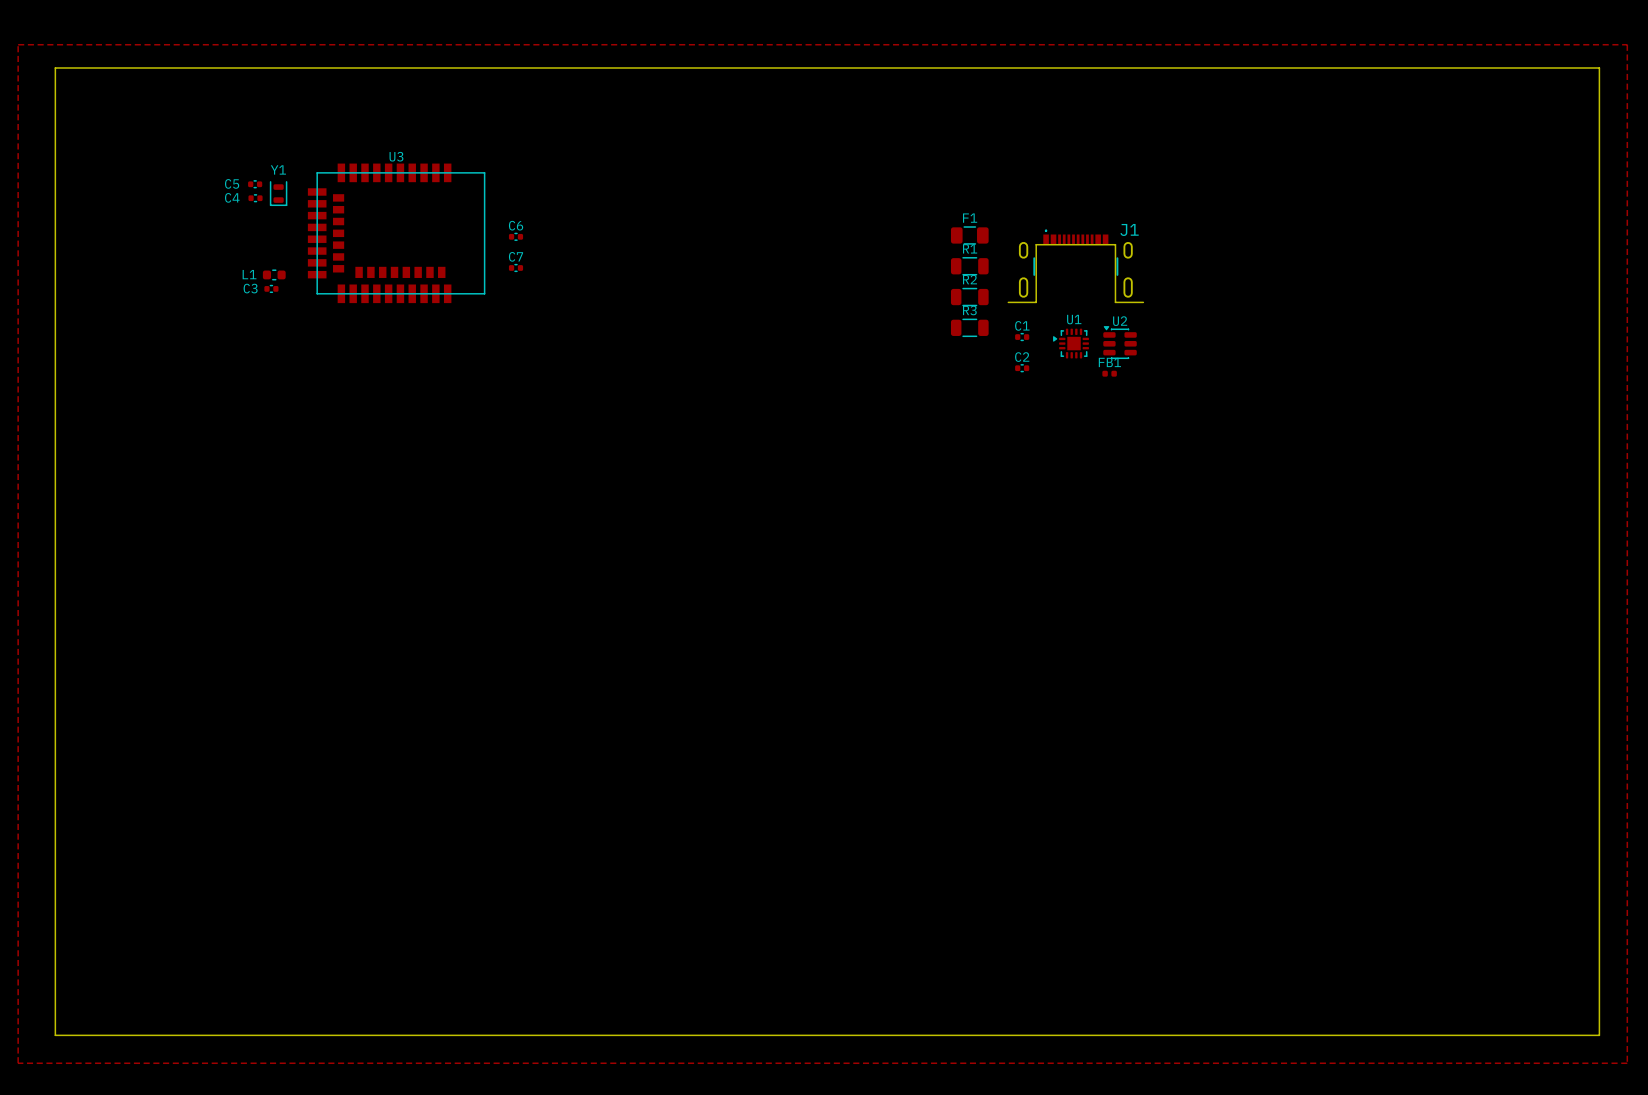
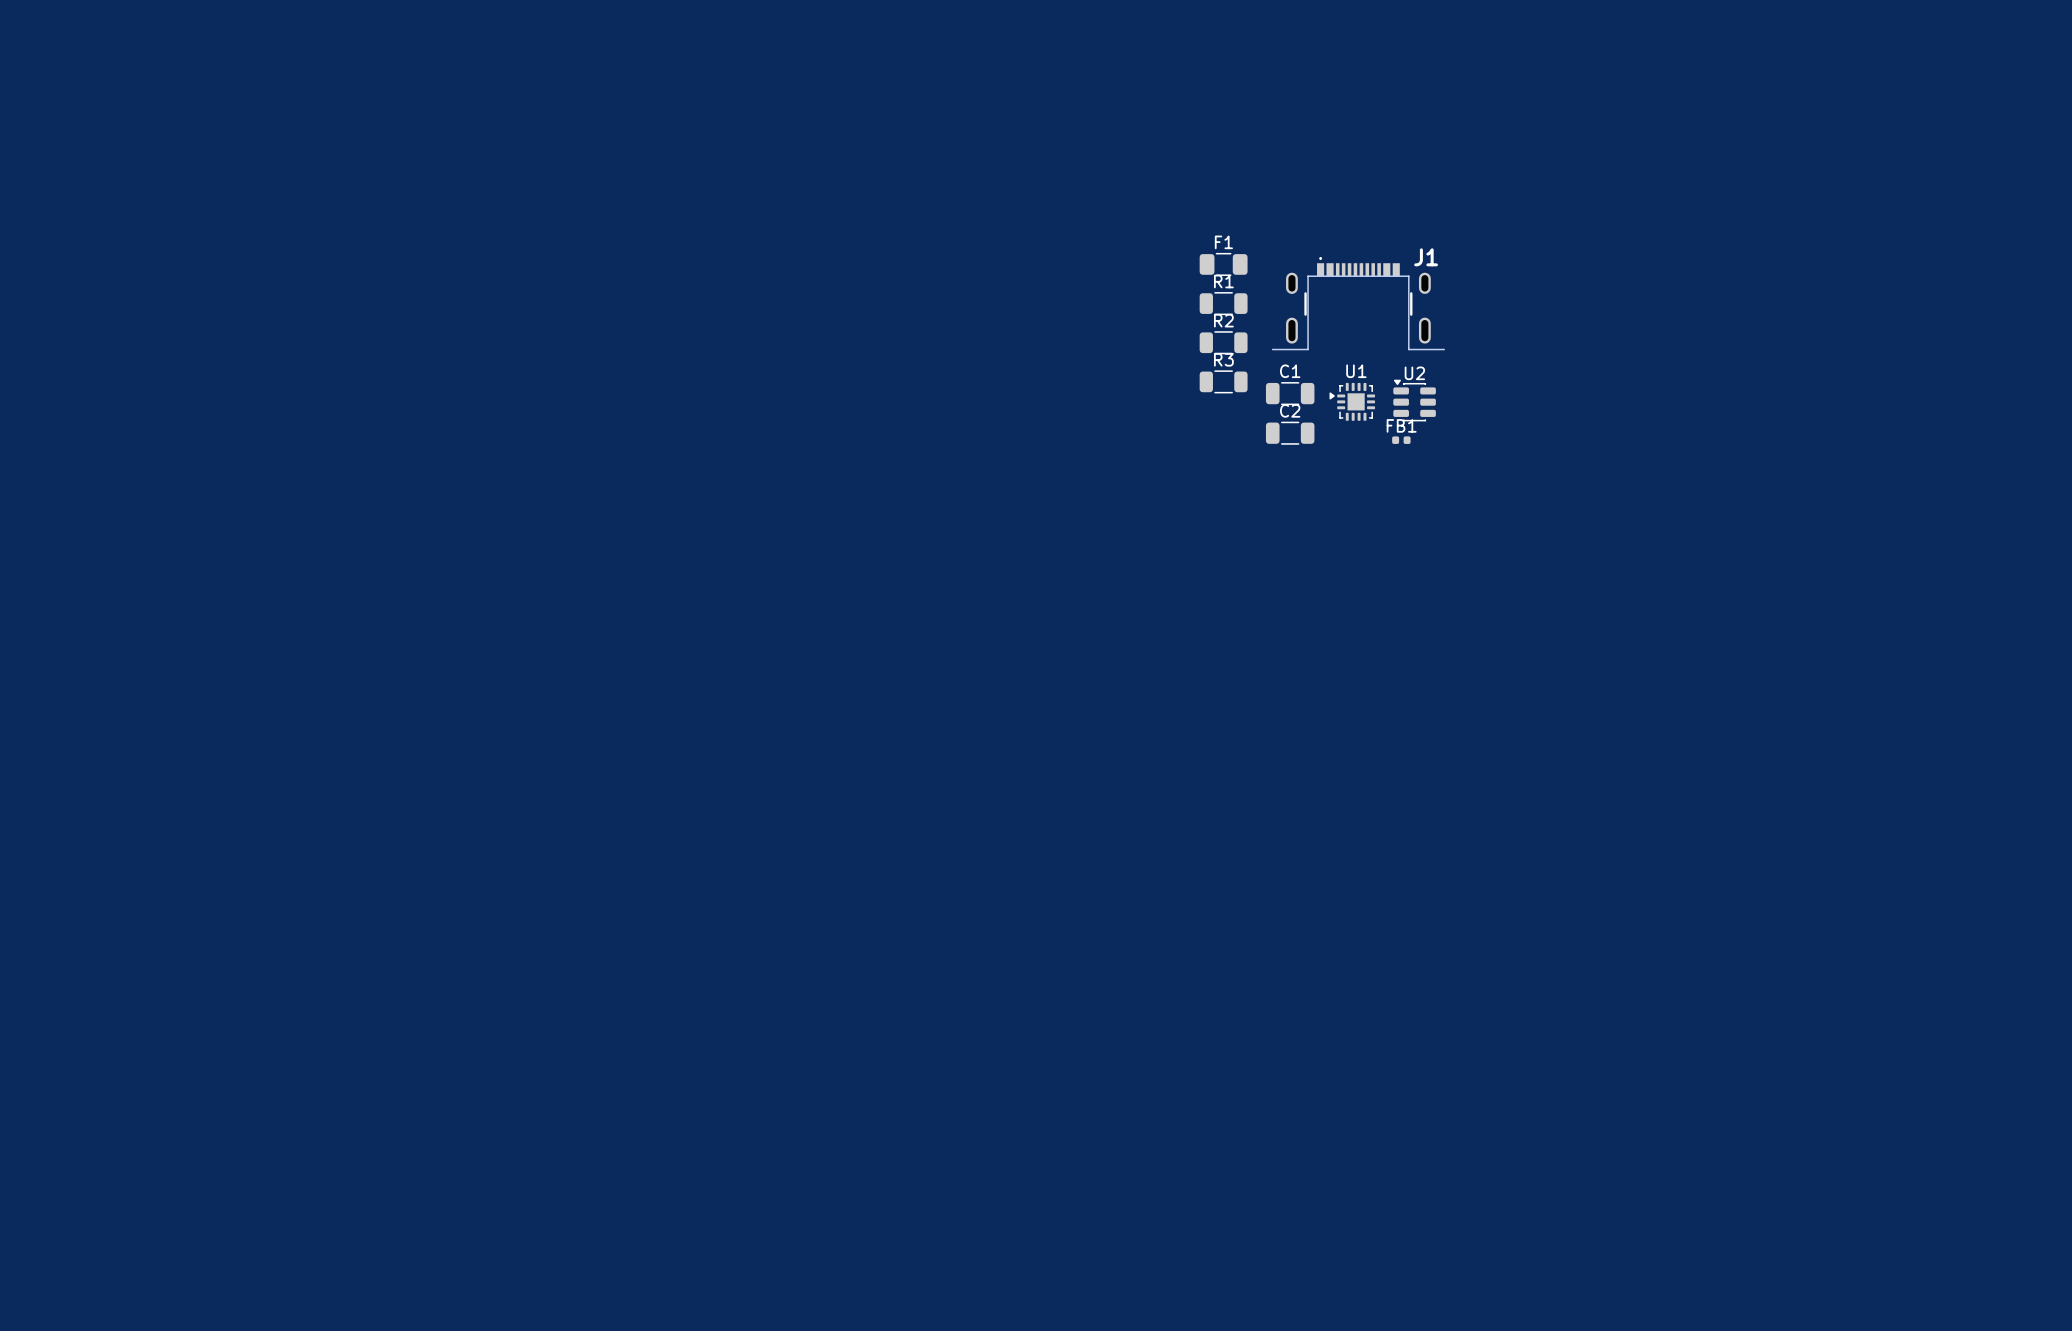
zone outline: (18, 44) (1627, 44) (1627, 1063) (18, 1063) (18, 44) -> none
board edge: (55, 68) (1599, 68) (1599, 1035) (55, 1035) (55, 68) -> none
C5: (255, 184) -> none
Y1: (278, 193) -> none
C4: (255, 198) -> none
U3: (396, 233) -> none
C6: (516, 236) -> none
C7: (516, 267) -> none
L1: (274, 274) -> none
C3: (271, 288) -> none
C1 footprint: [1015, 333, 1030, 341] -> [1265, 382, 1315, 406]
C2 footprint: [1015, 364, 1030, 373] -> [1265, 421, 1315, 445]

